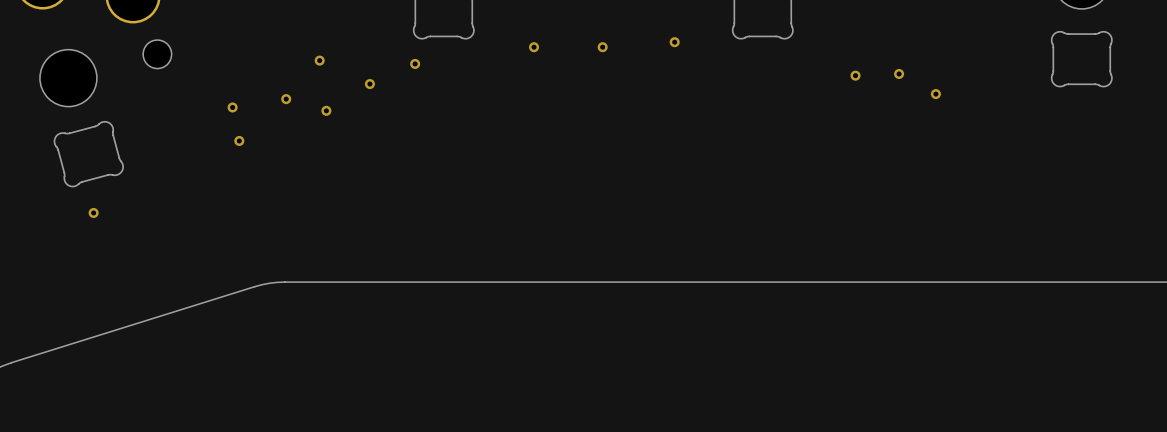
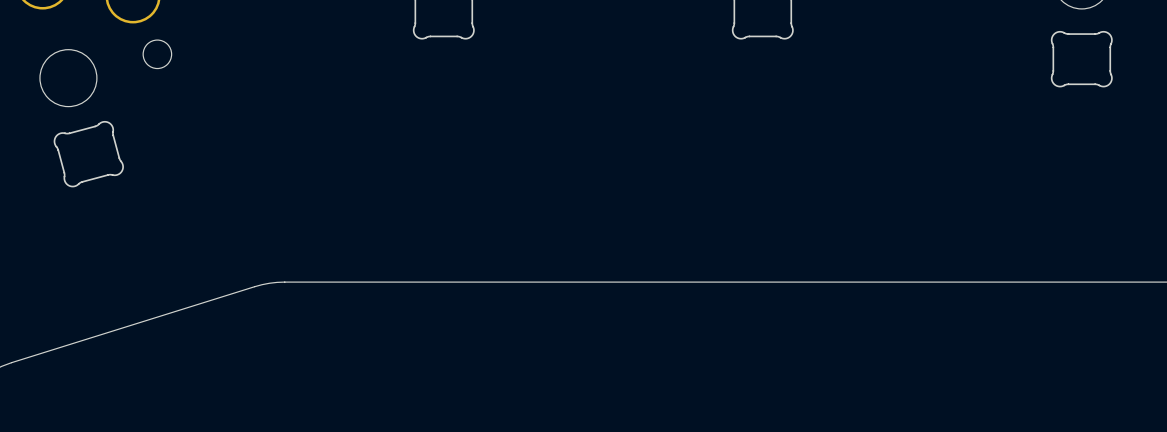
via: (674, 42) -> none
via: (534, 47) -> none
via: (602, 47) -> none
via: (319, 60) -> none
via: (415, 63) -> none
via: (899, 73) -> none
via: (855, 75) -> none
via: (369, 84) -> none
via: (935, 94) -> none
via: (286, 99) -> none
via: (232, 107) -> none
via: (326, 110) -> none
via: (239, 140) -> none
via: (93, 212) -> none

